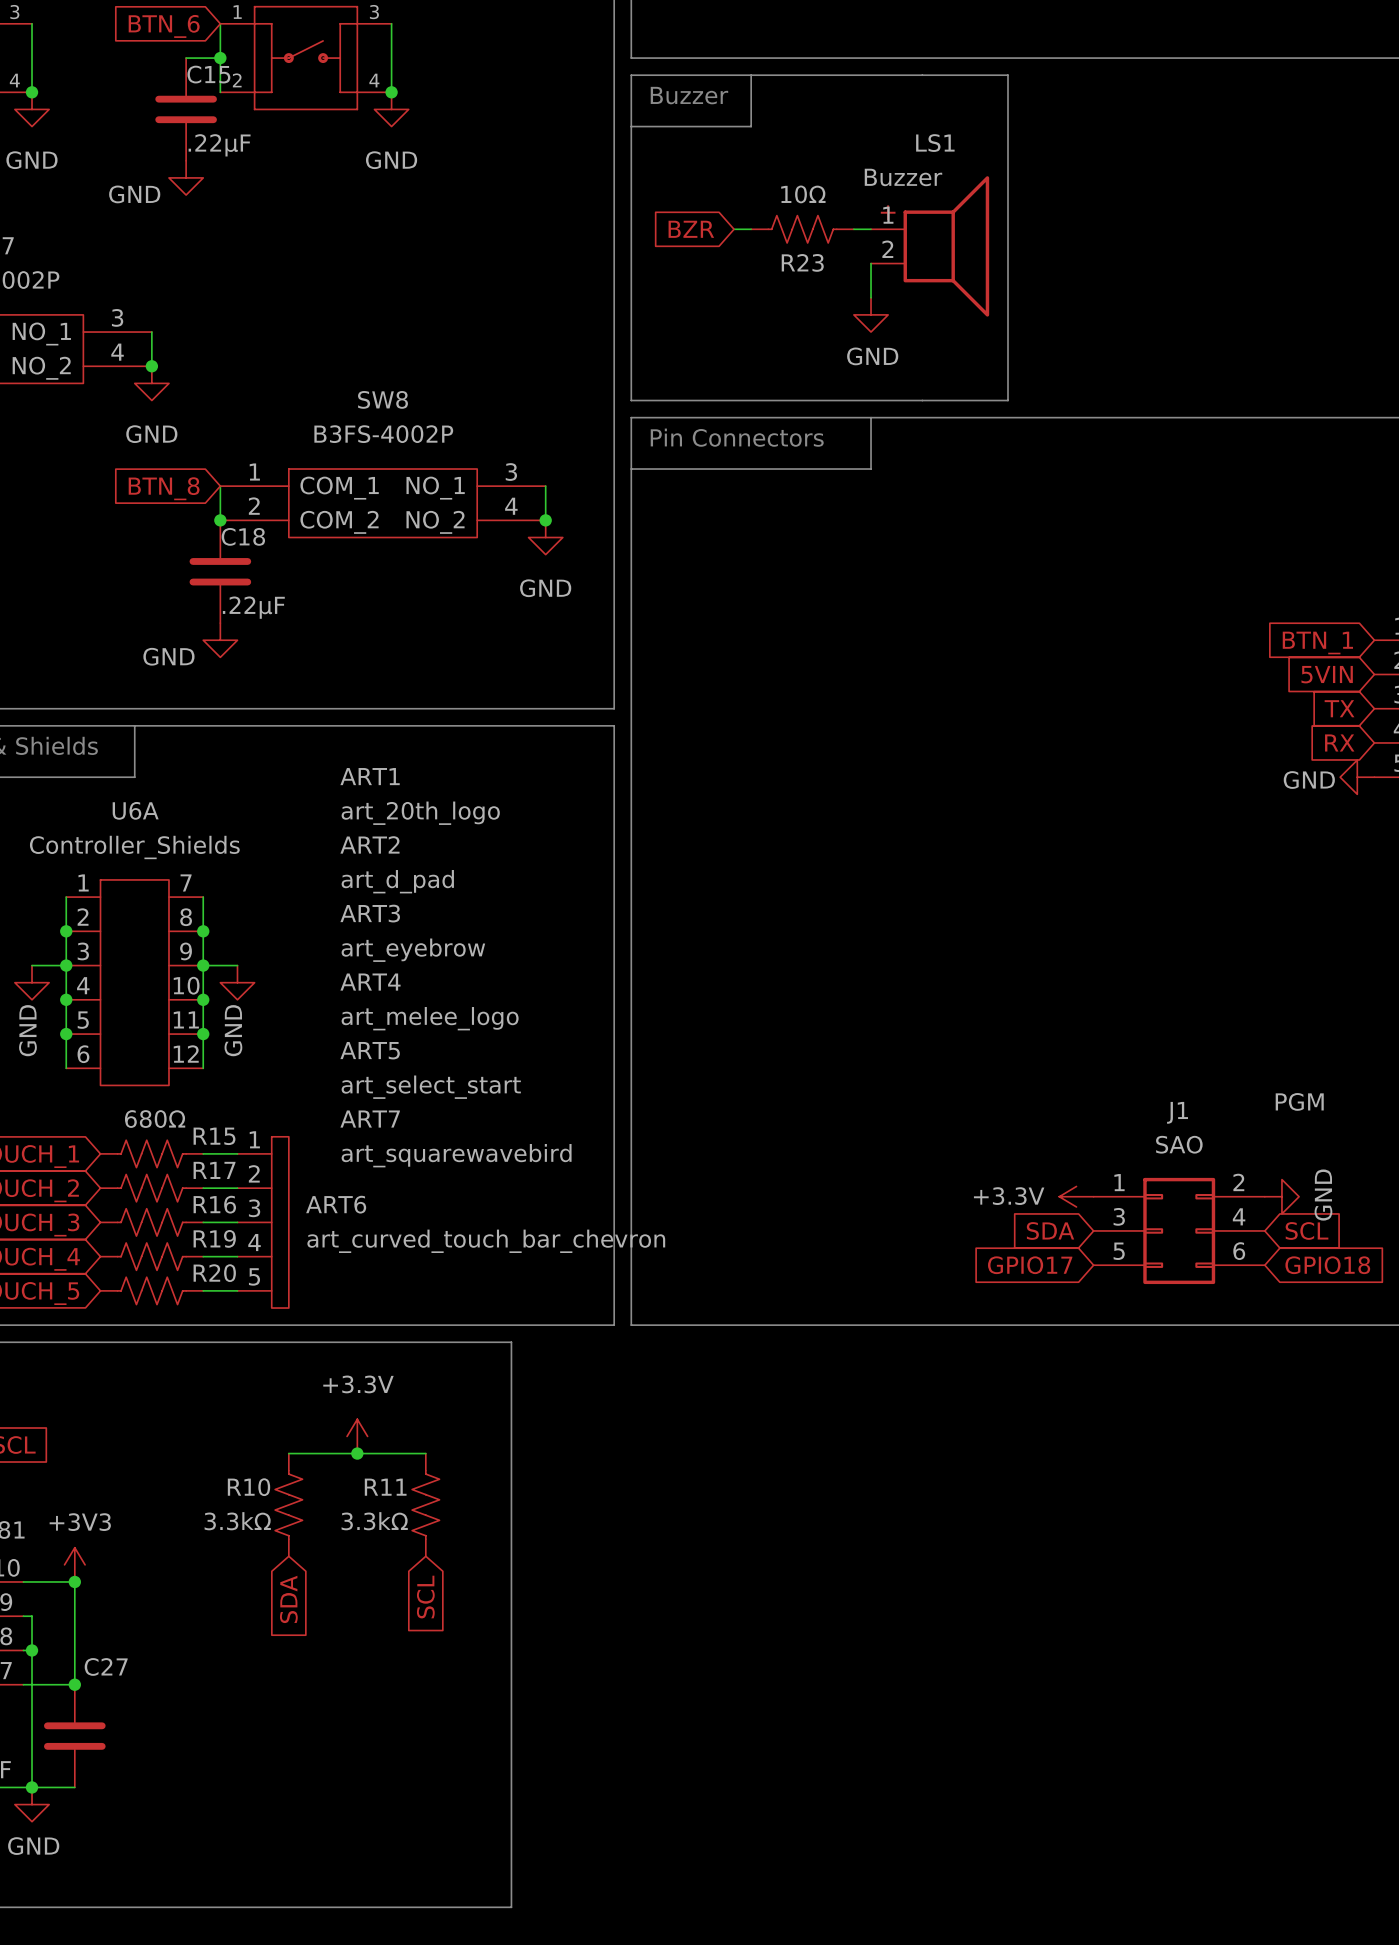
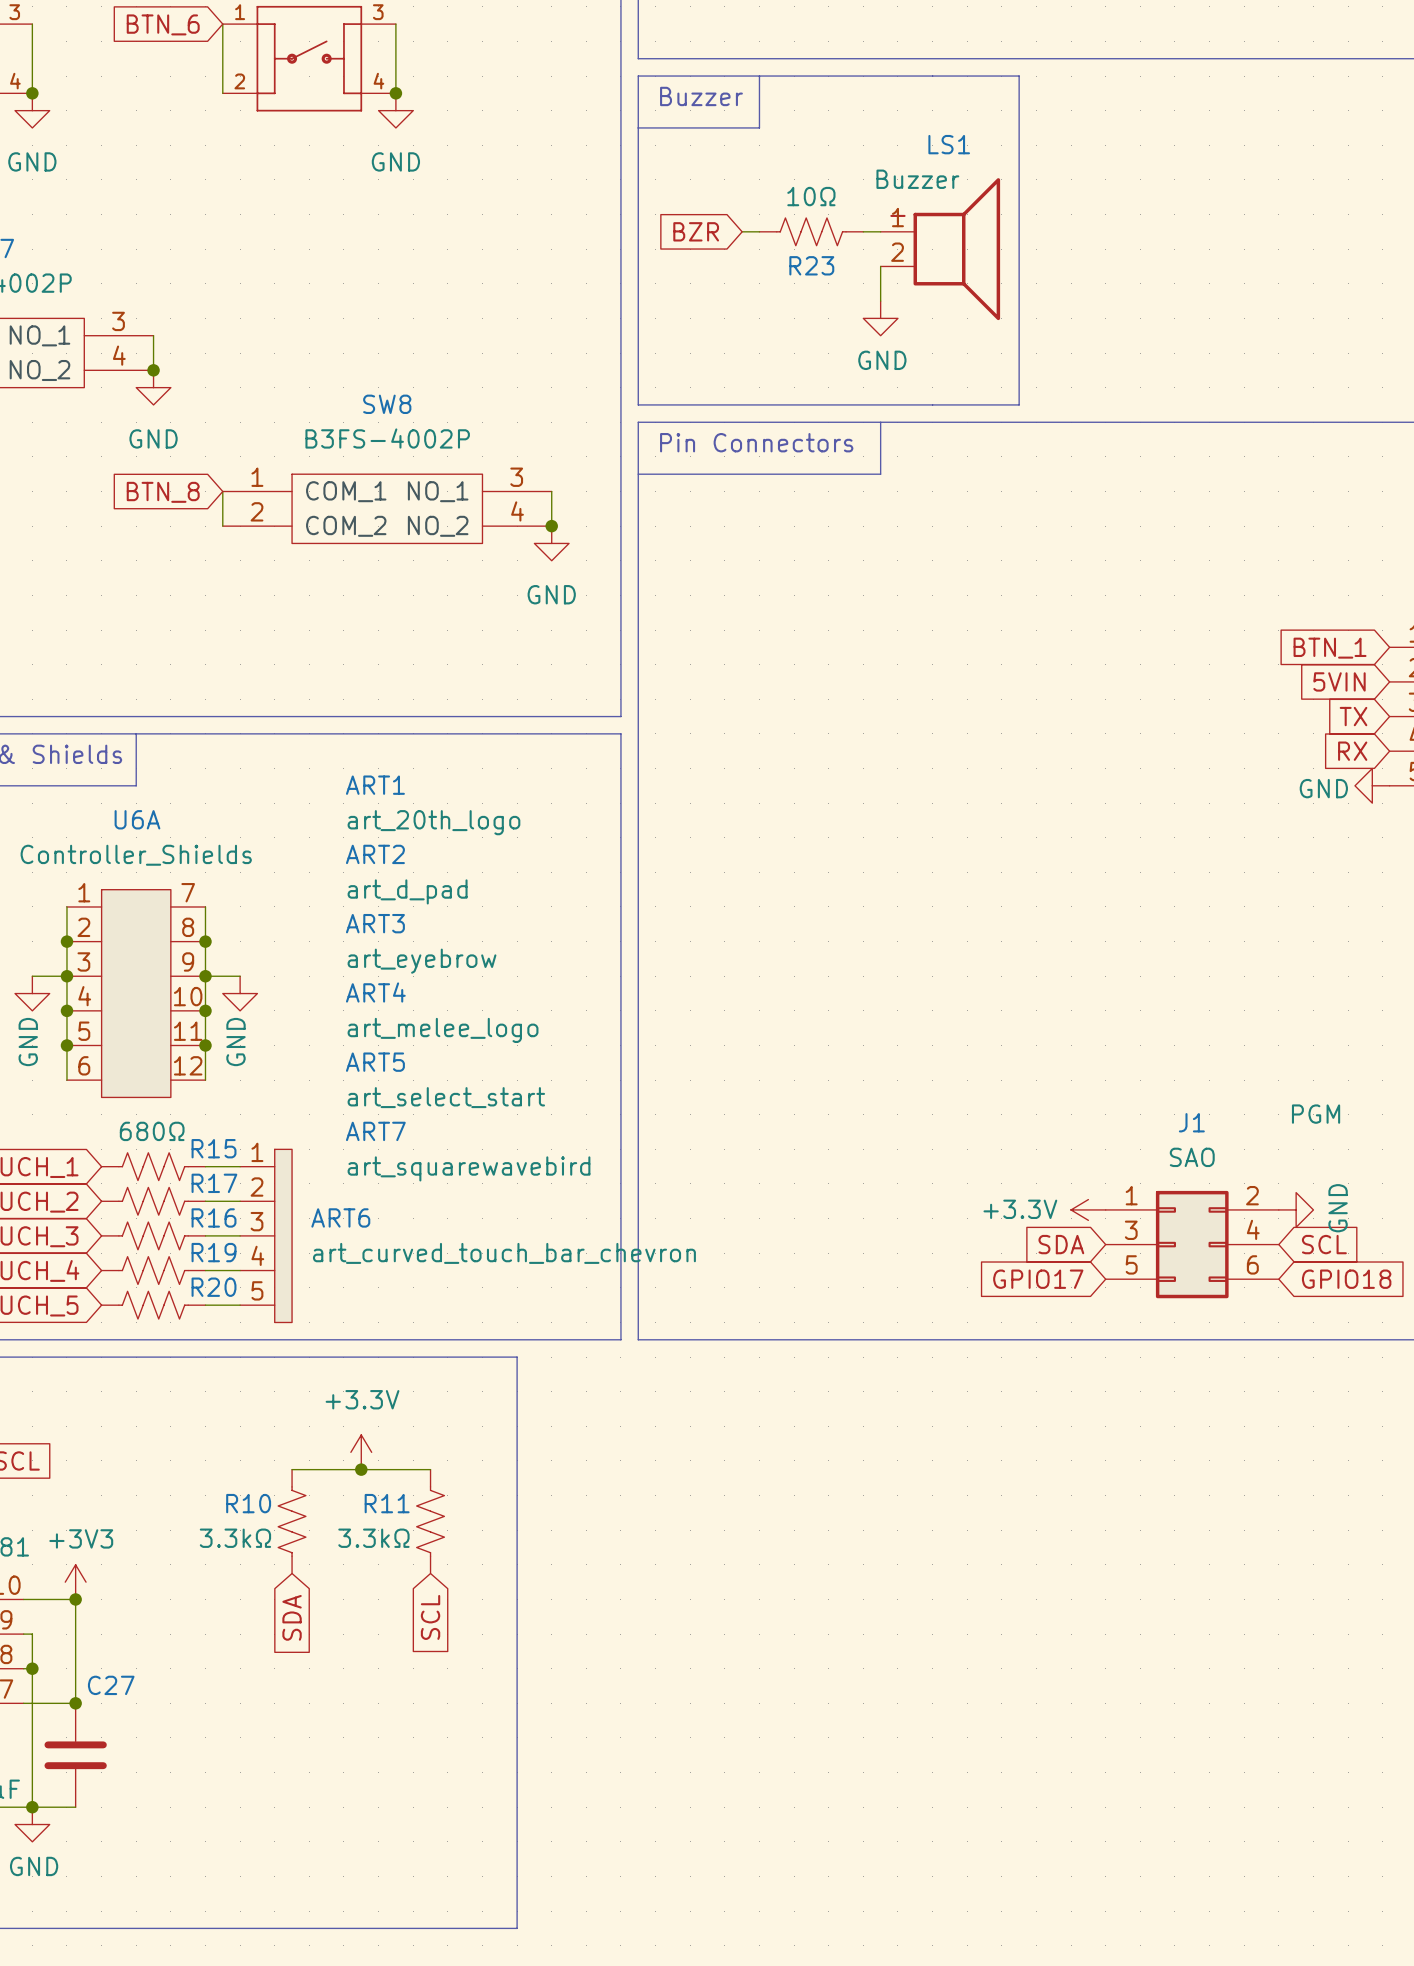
wire: (186, 58) (220, 58) -> none
junction: (220, 58) -> none
C15: .22μF (186, 109) -> none
power symbol: GND (186, 177) -> none
junction: (220, 520) -> none
C18: .22μF (220, 571) -> none
power symbol: GND (220, 640) -> none

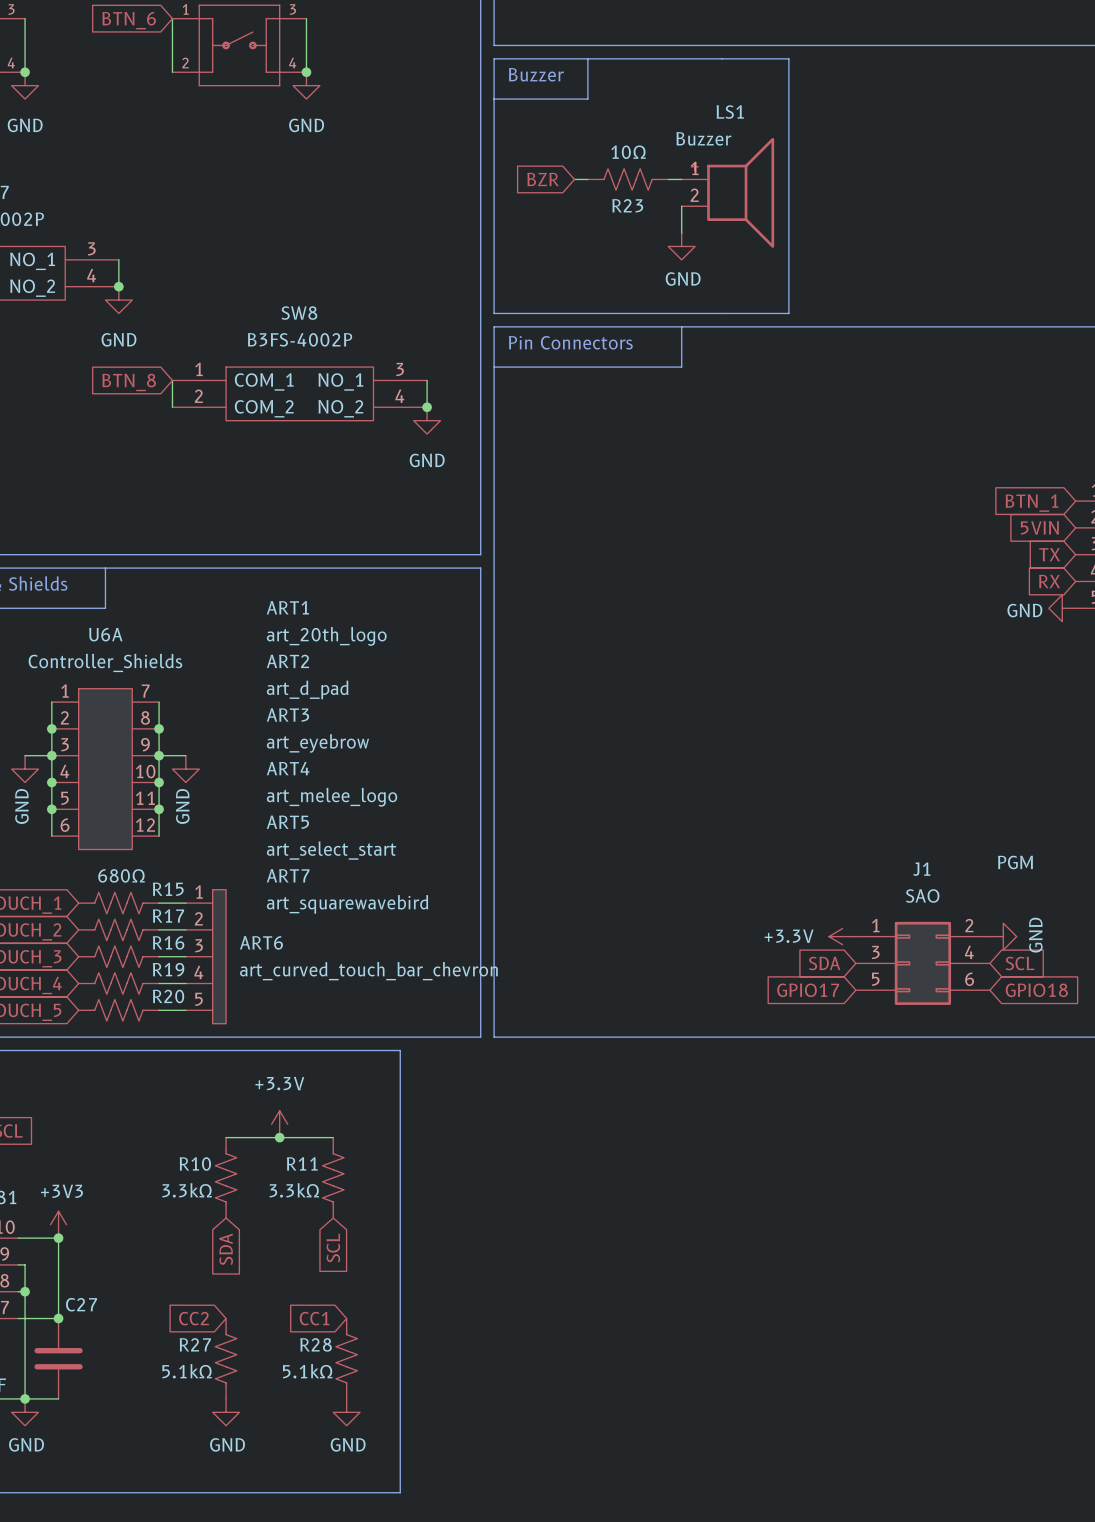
global label: none -> CC2 (193, 1318)
global label: none -> CC1 (314, 1318)
R27: none -> 5.1kΩ (226, 1358)
R28: none -> 5.1kΩ (346, 1358)
power symbol: none -> GND (226, 1412)
power symbol: none -> GND (346, 1412)

